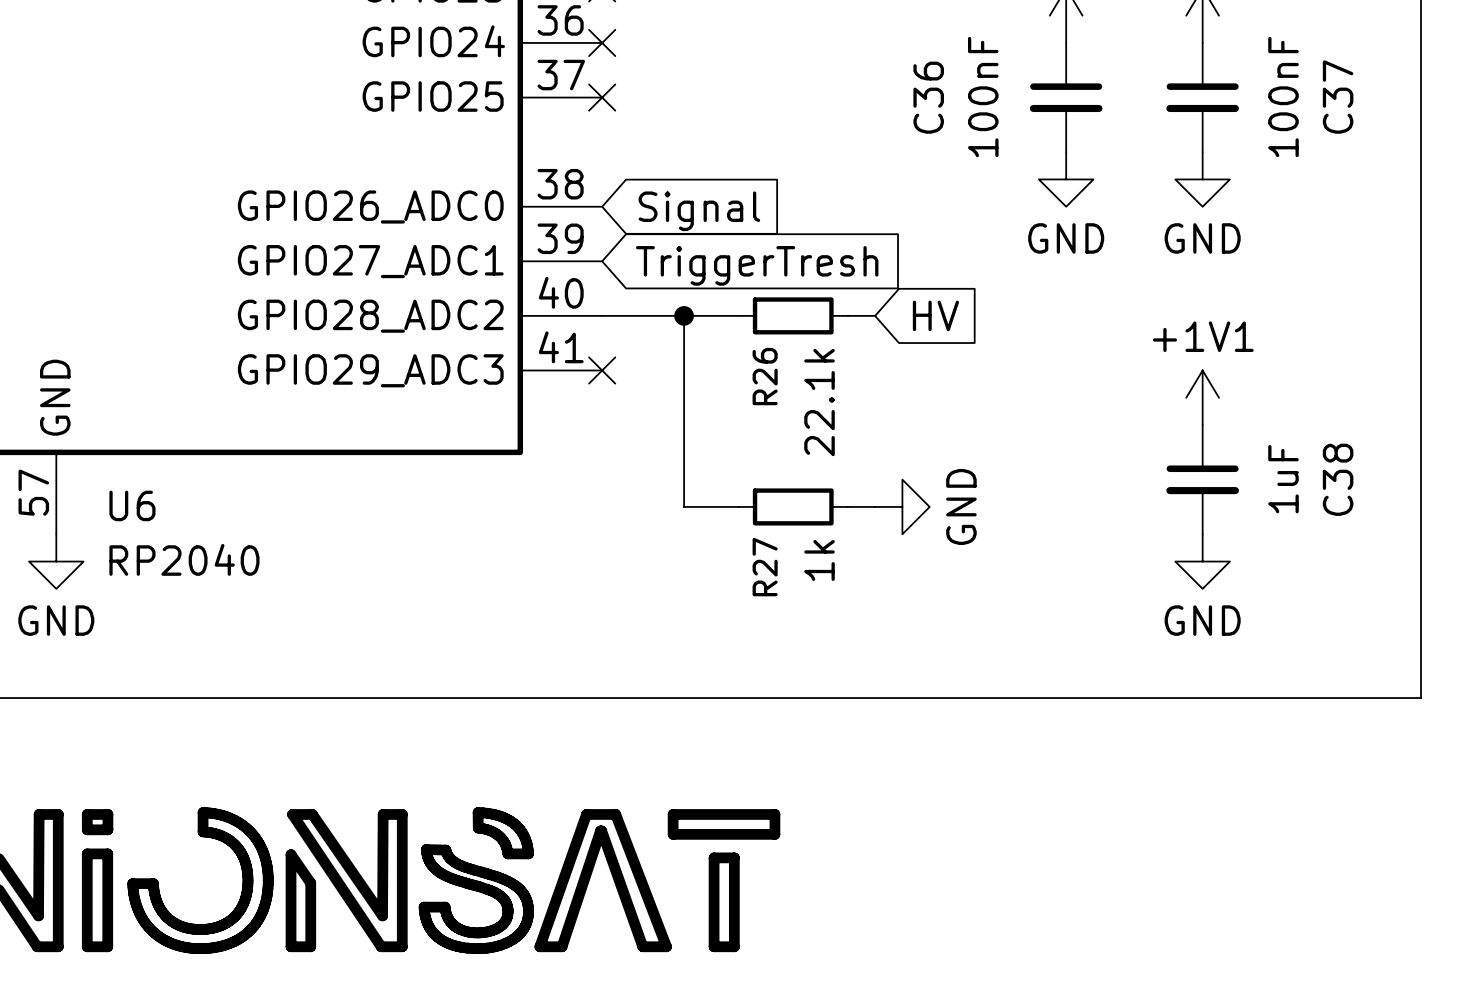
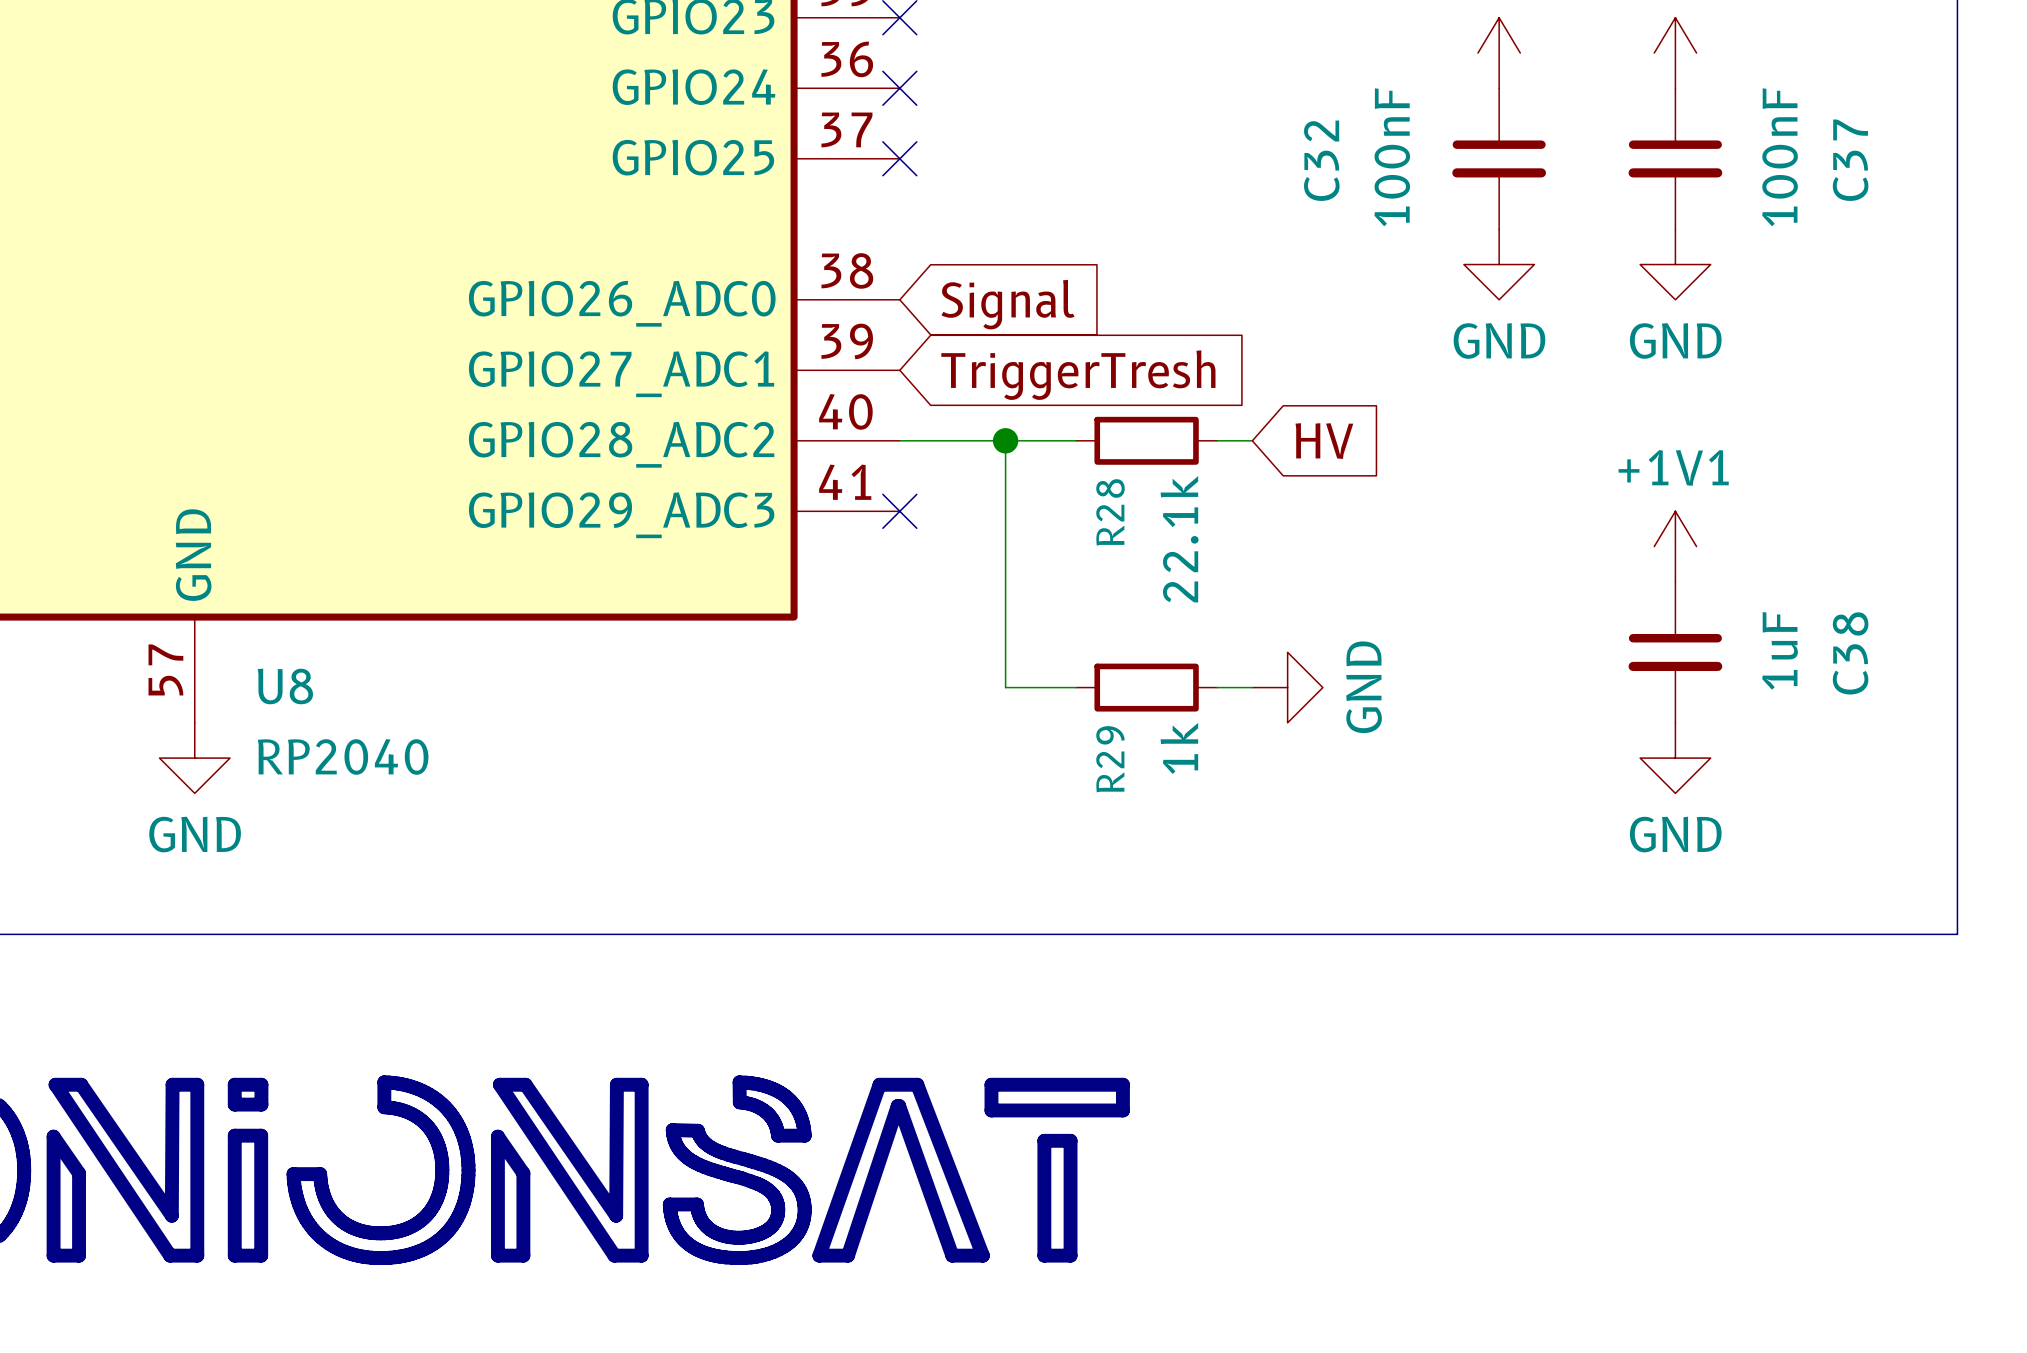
C36 name: C36 (928, 97) -> C32 (1321, 160)
R26 name: R26 (765, 376) -> R28 (1110, 512)
U6 name: U6 (132, 505) -> U8 (285, 686)
R27 name: R27 (765, 567) -> R29 (1110, 759)

